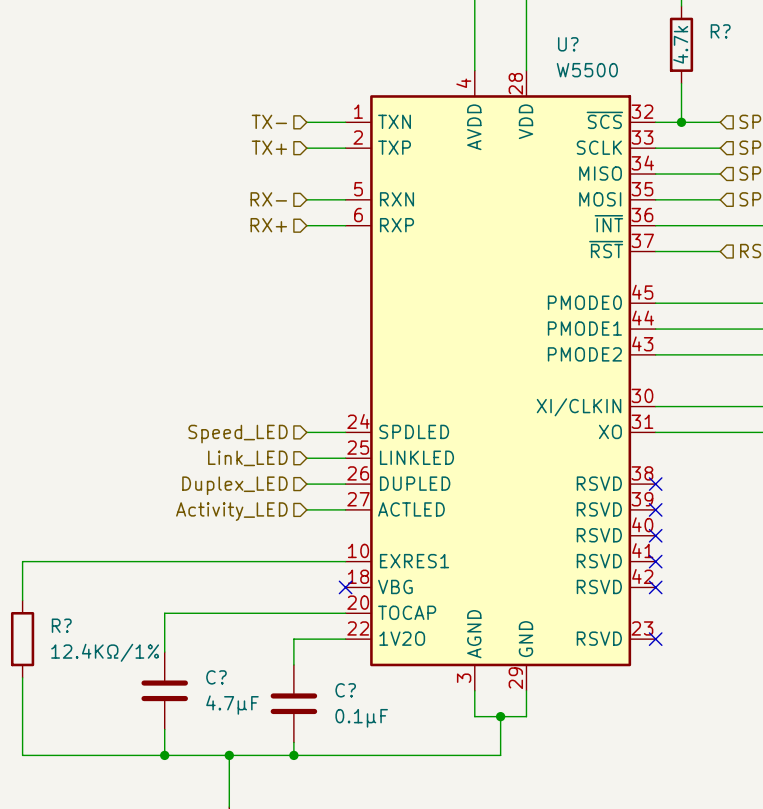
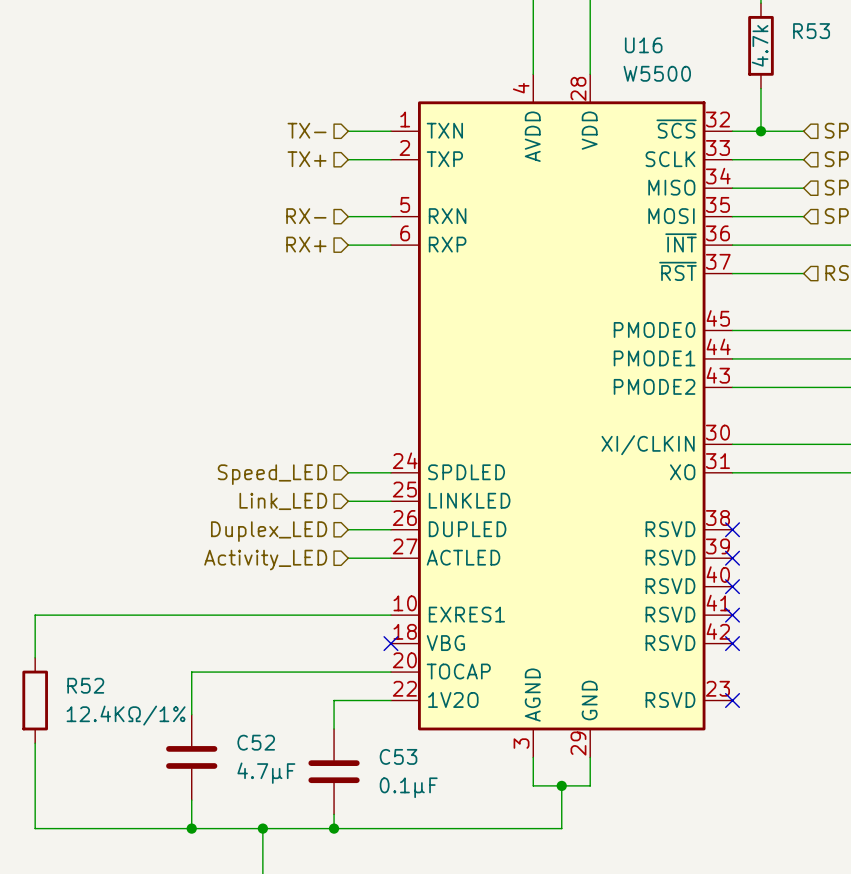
R? name: R? (720, 31) -> R53 (811, 31)
U? name: U? (568, 44) -> U16 (643, 45)
R? name: R? (61, 625) -> R52 (85, 685)
C? name: C? (216, 677) -> C52 (256, 742)
C? name: C? (345, 690) -> C53 (398, 756)

